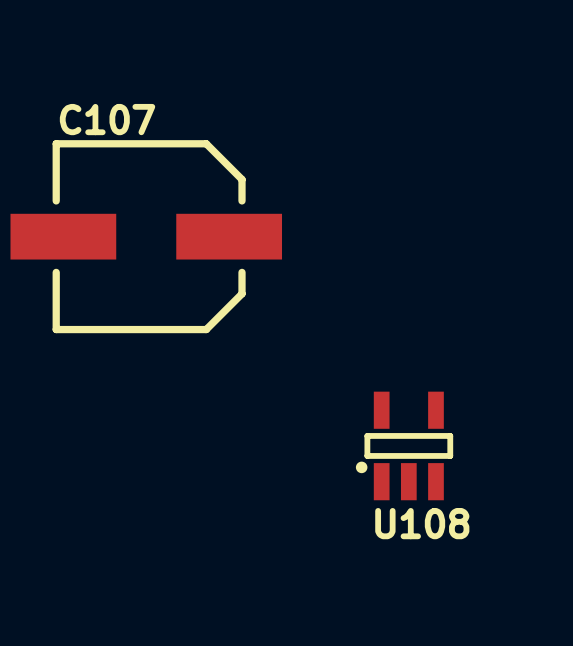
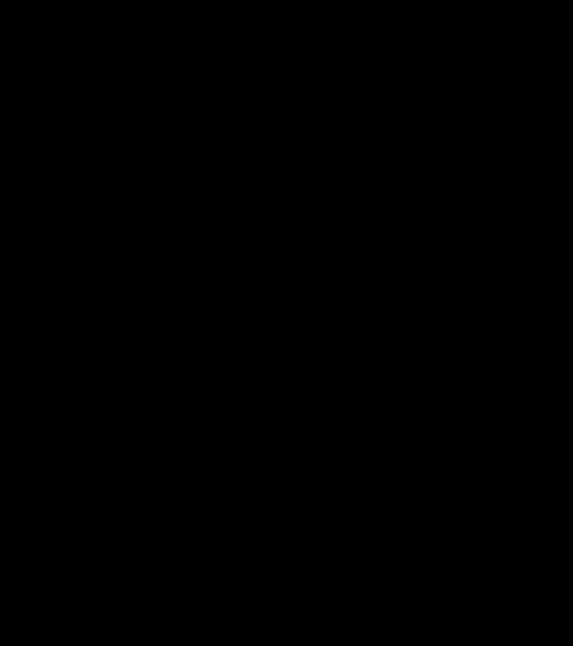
C107: (146, 236) -> none
U108: (404, 445) -> none

